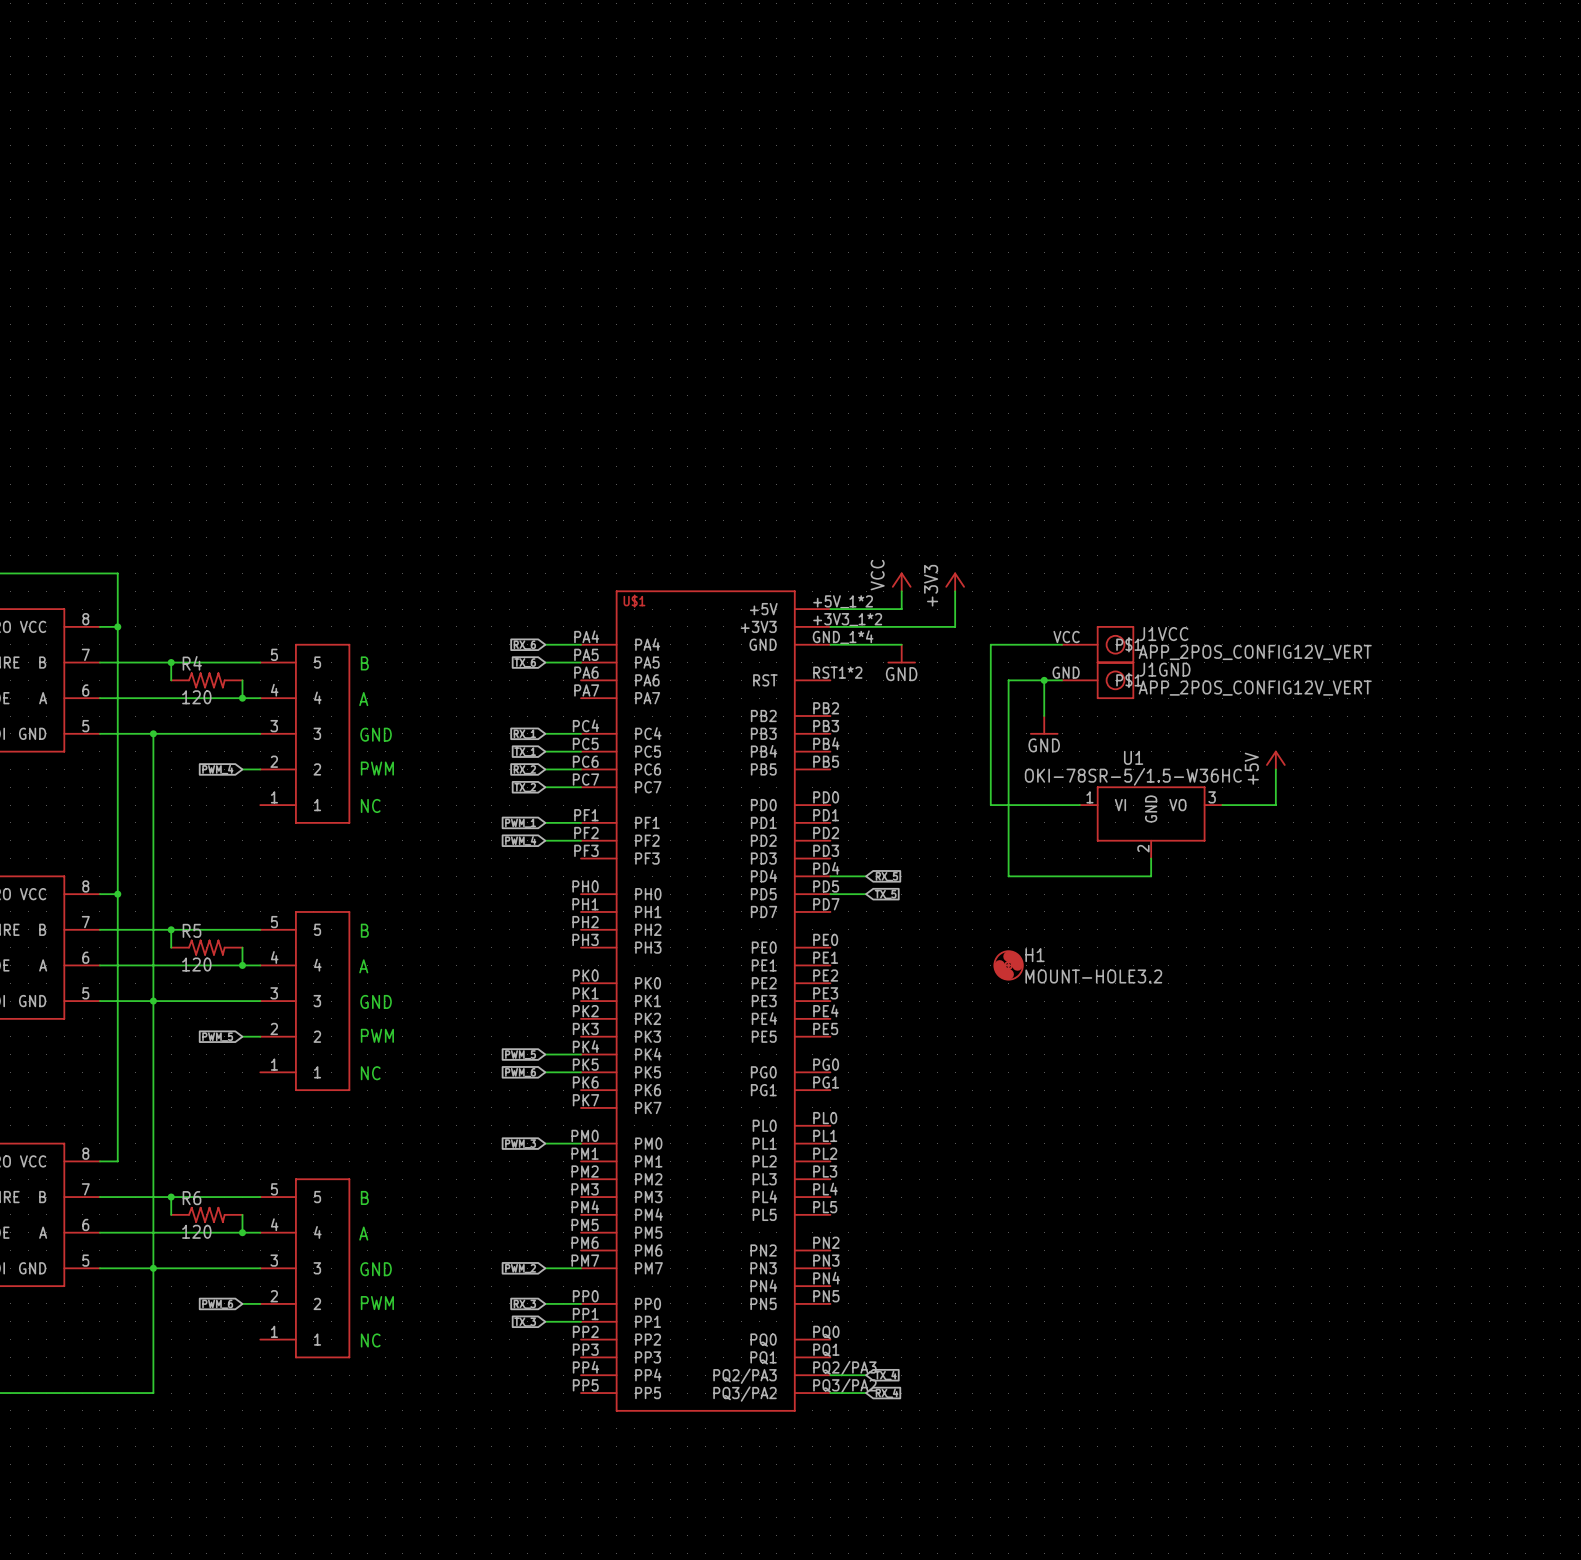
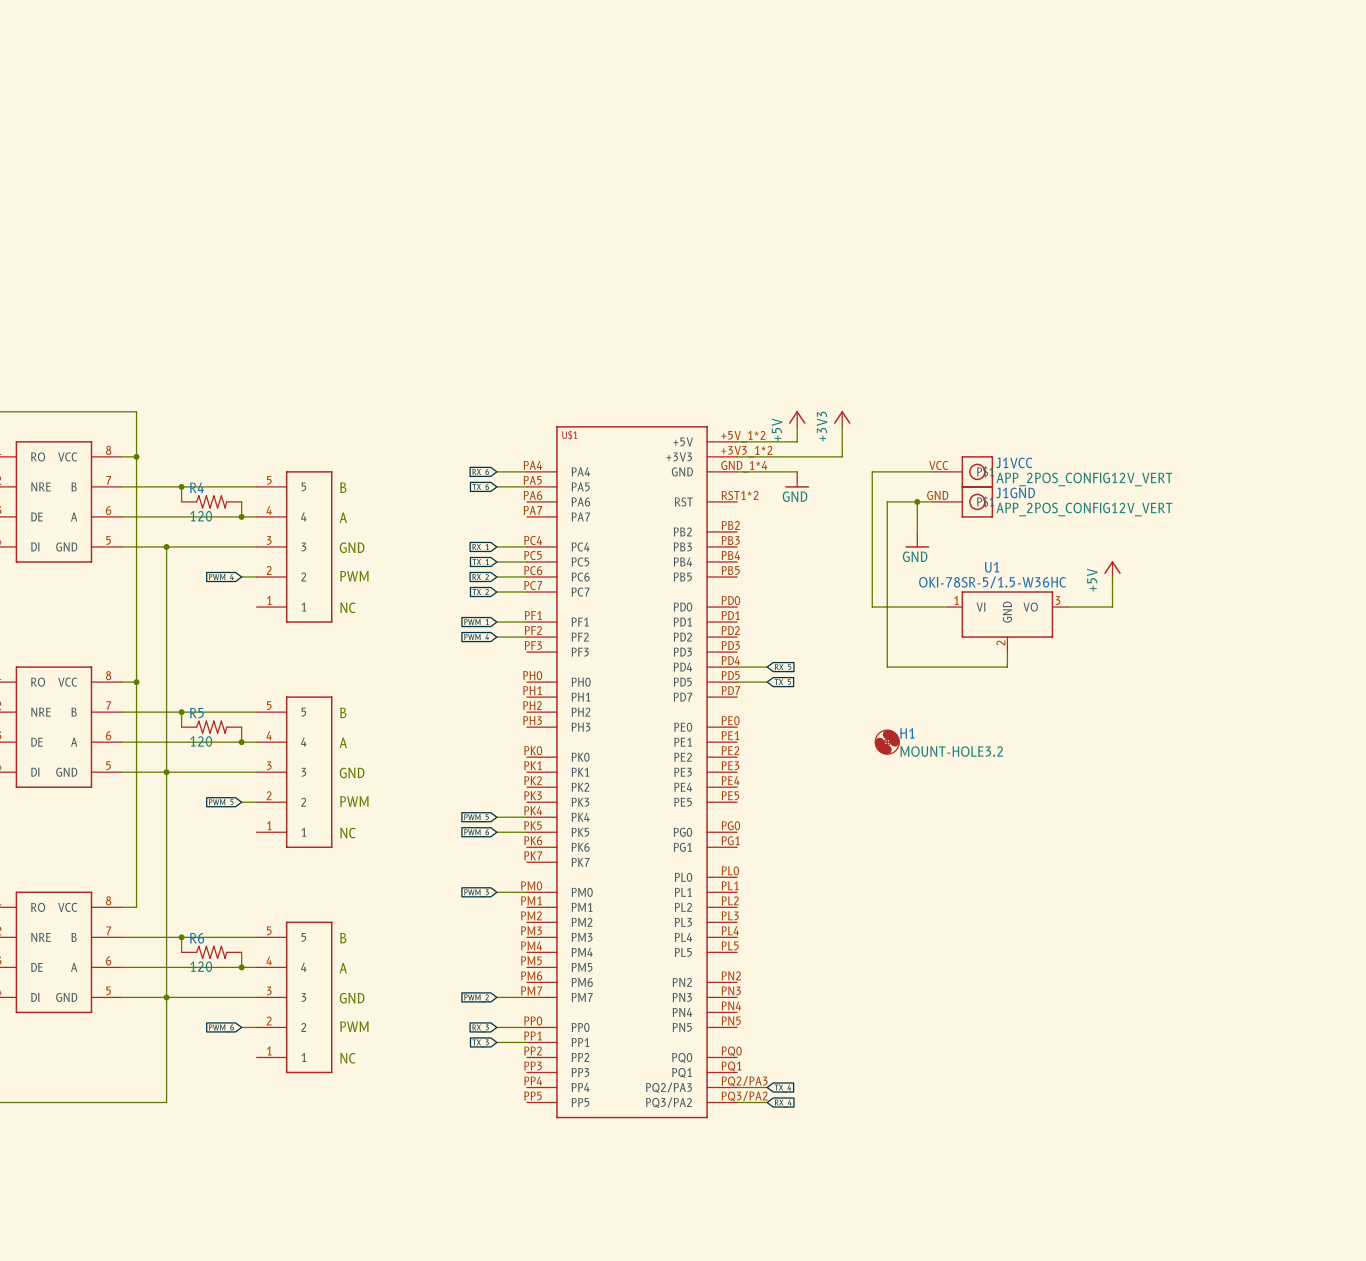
power symbol: VCC (901, 581) -> +5V (797, 418)

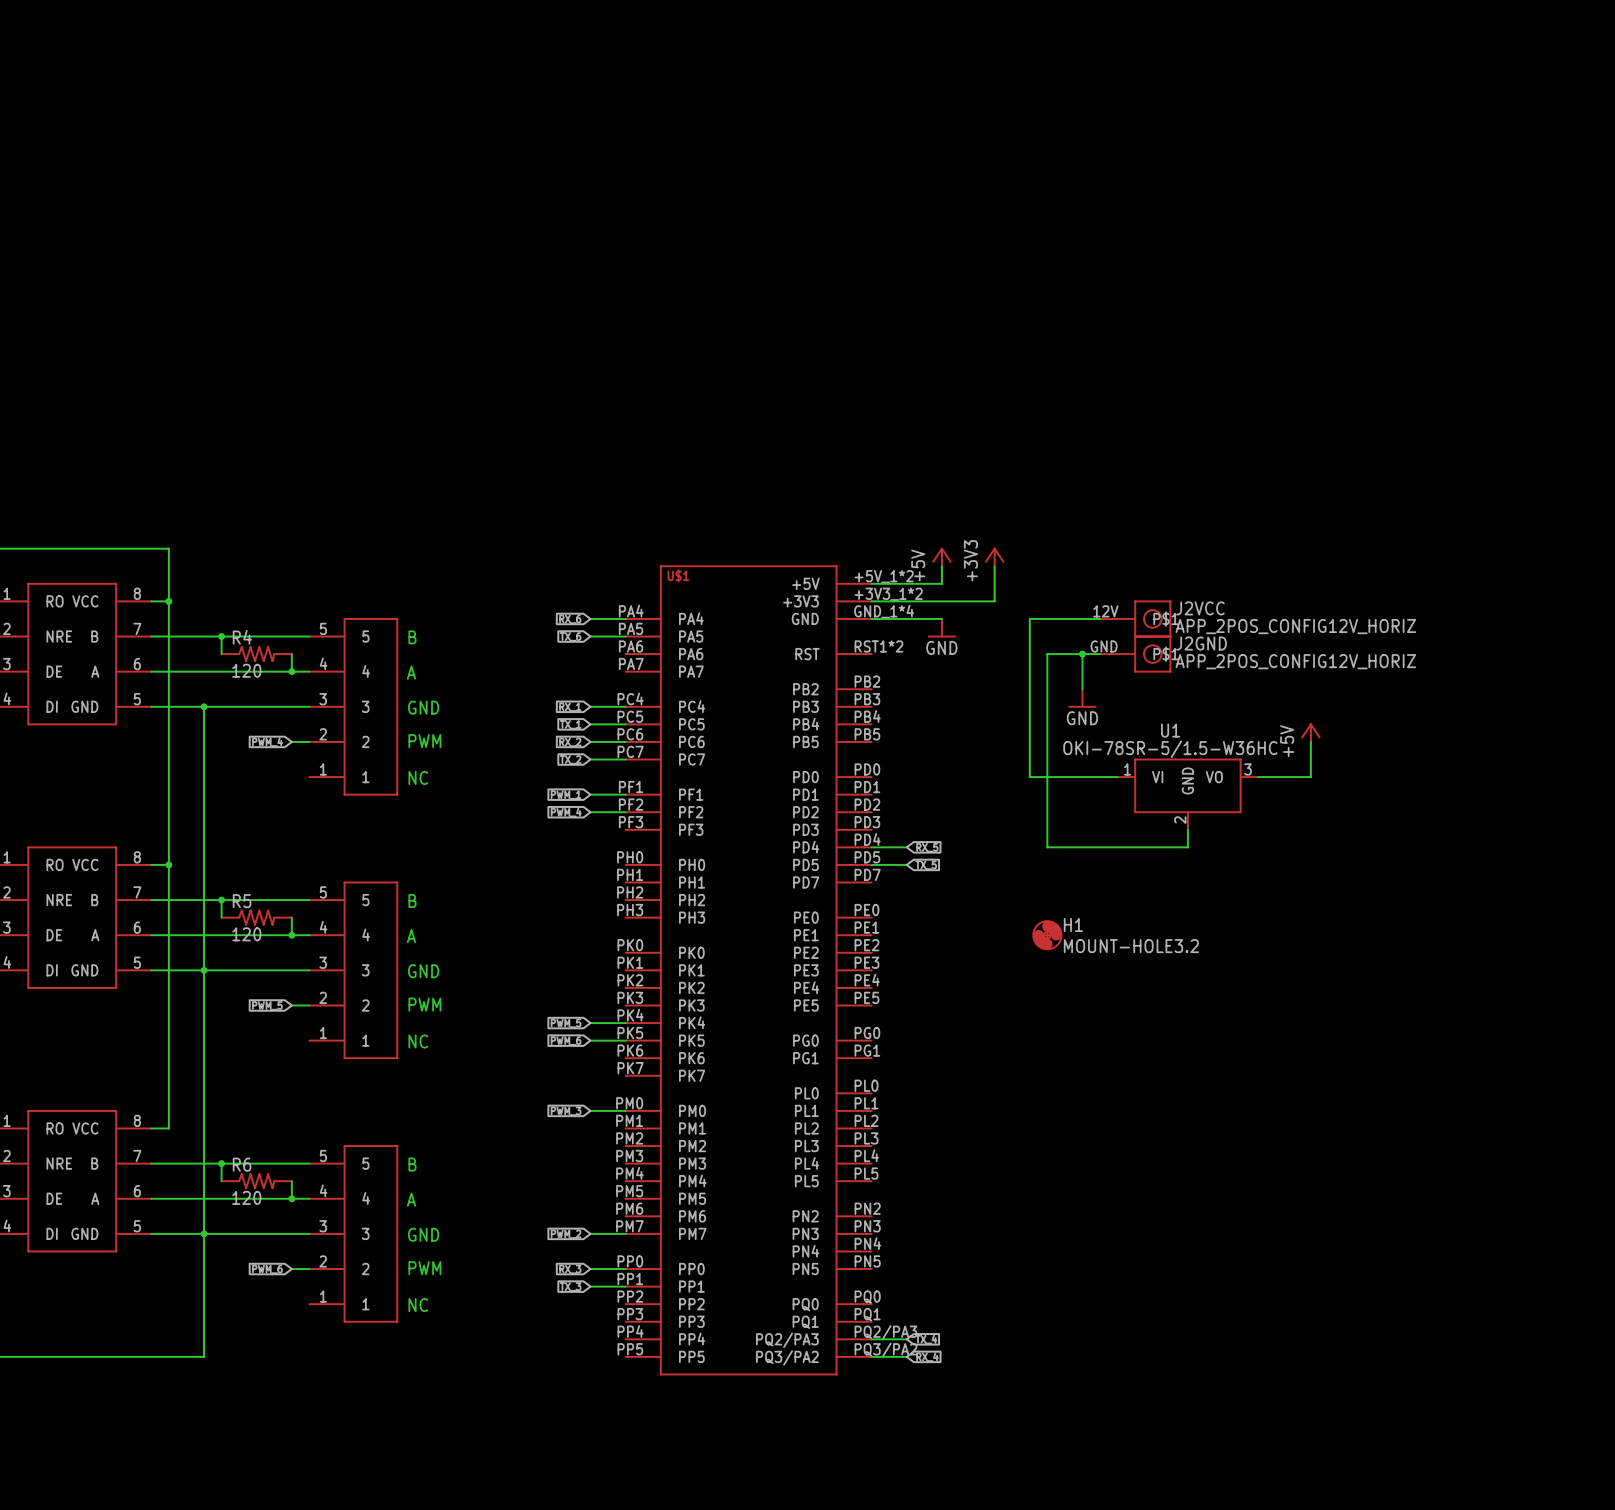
J1VCC name: J1VCC (1014, 462) -> J2VCC (1200, 608)
J1VCC pin number: VCC (938, 465) -> 12V (1105, 611)
J1VCC value: APP_2POS_CONFIG12V_VERT (1084, 479) -> APP_2POS_CONFIG12V_HORIZ (1295, 626)
J1GND name: J1GND (1015, 492) -> J2GND (1201, 643)
J1GND value: APP_2POS_CONFIG12V_VERT (1084, 509) -> APP_2POS_CONFIG12V_HORIZ (1295, 661)

